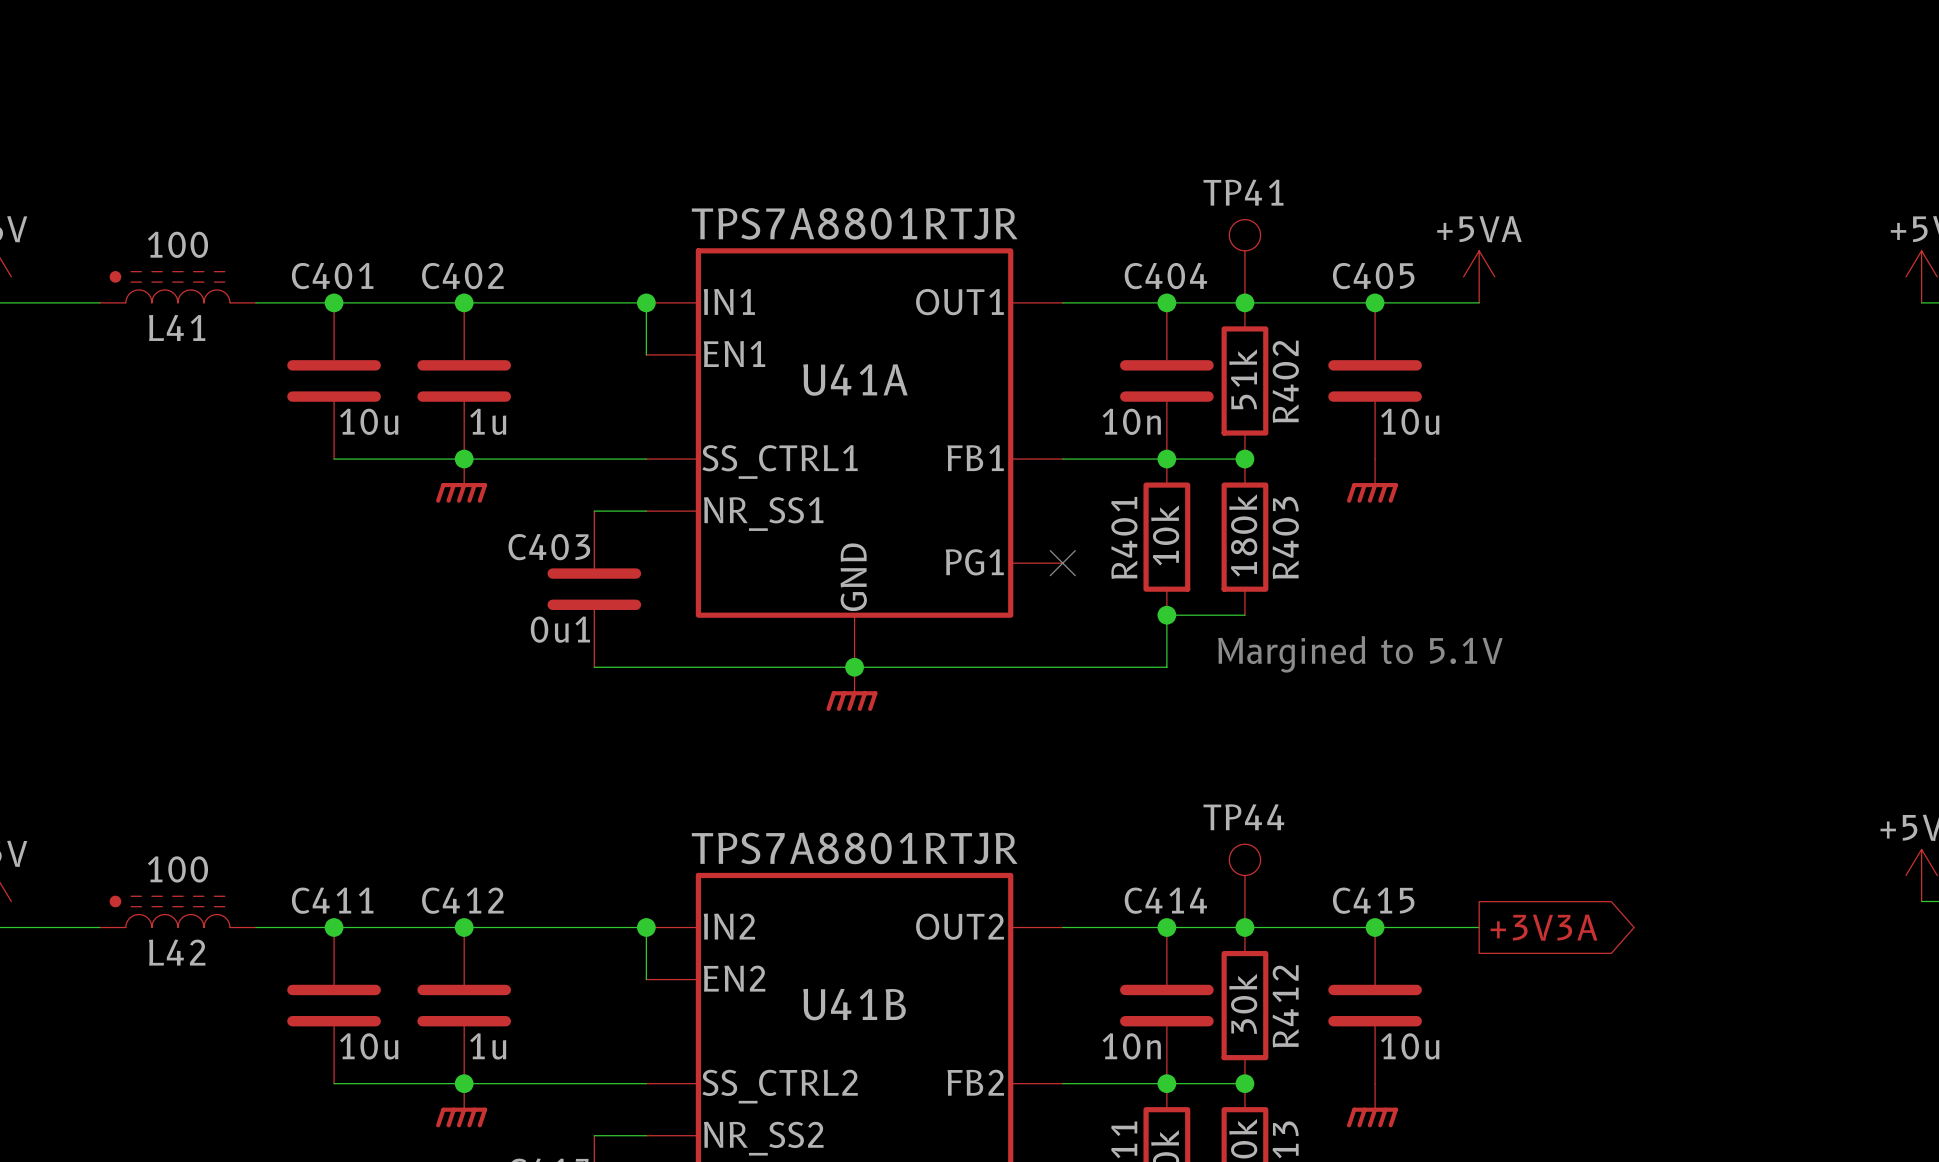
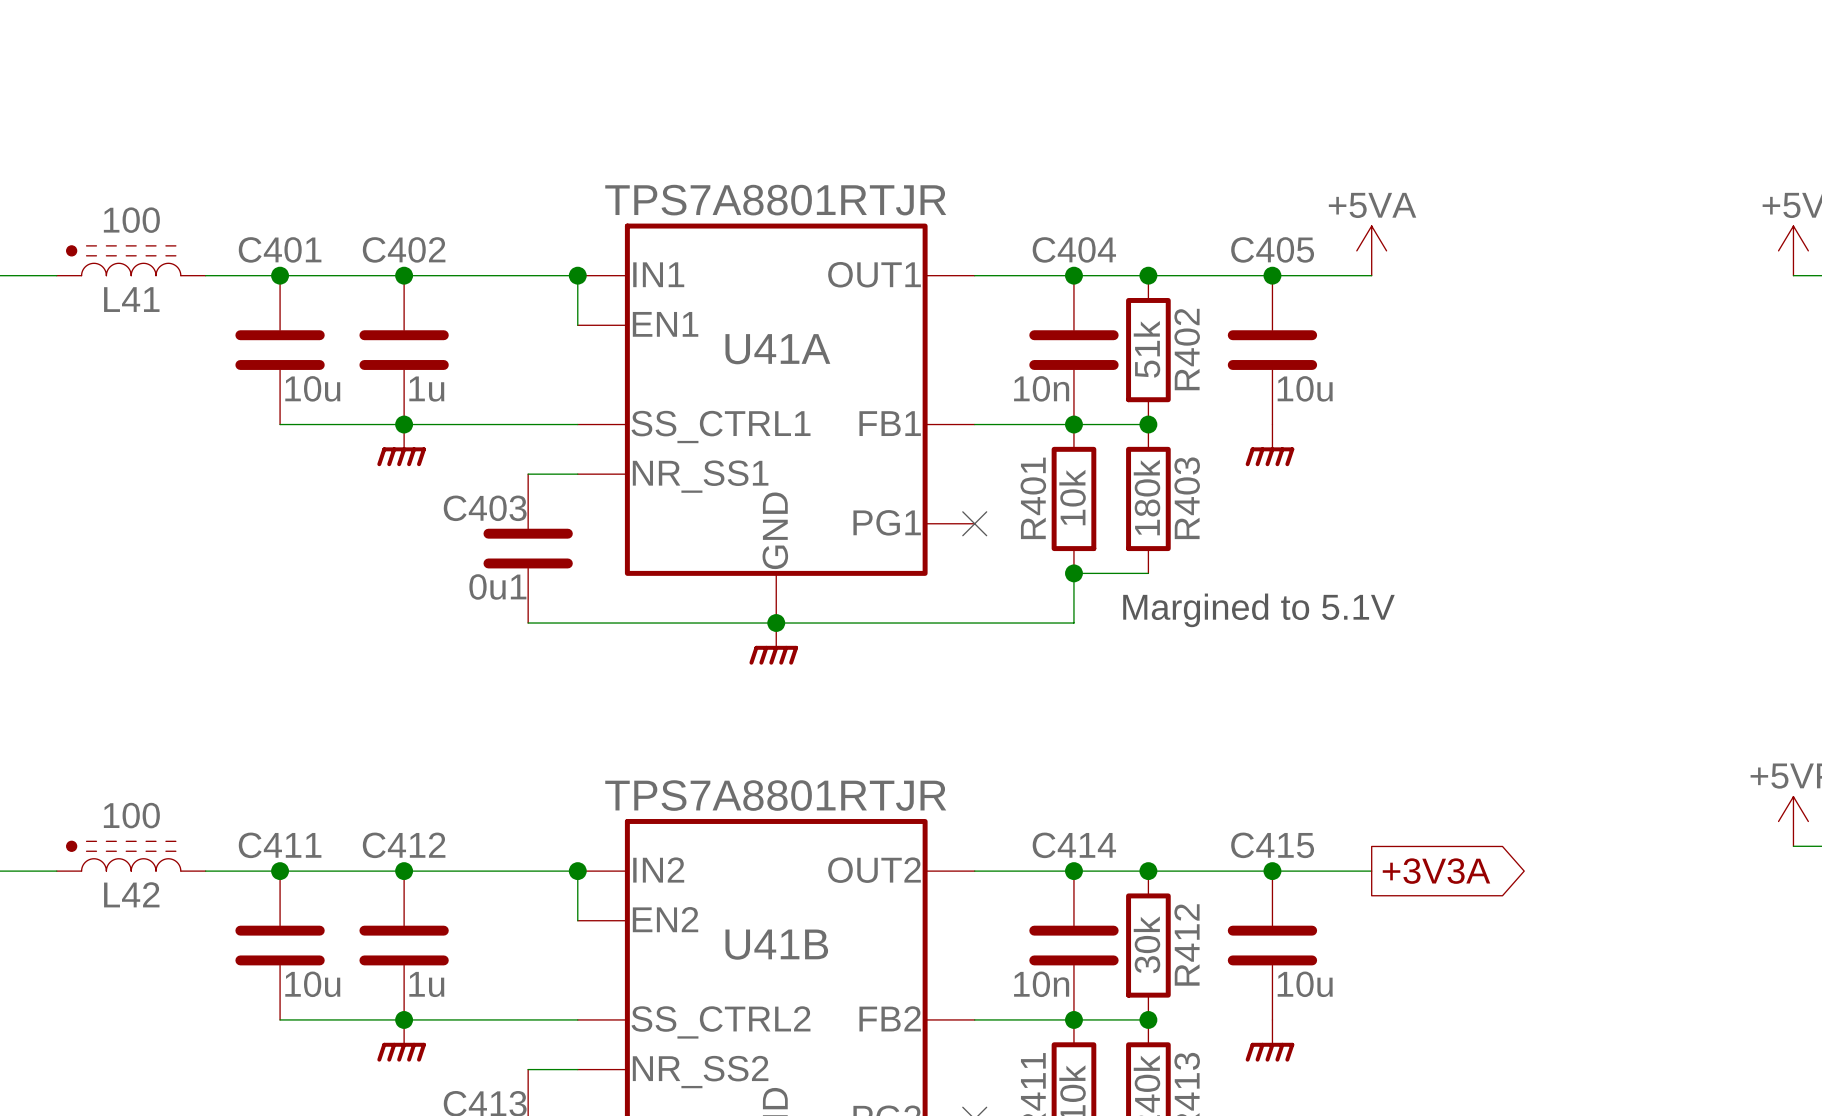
TP41: (1244, 261) -> none
TP44: (1244, 885) -> none

